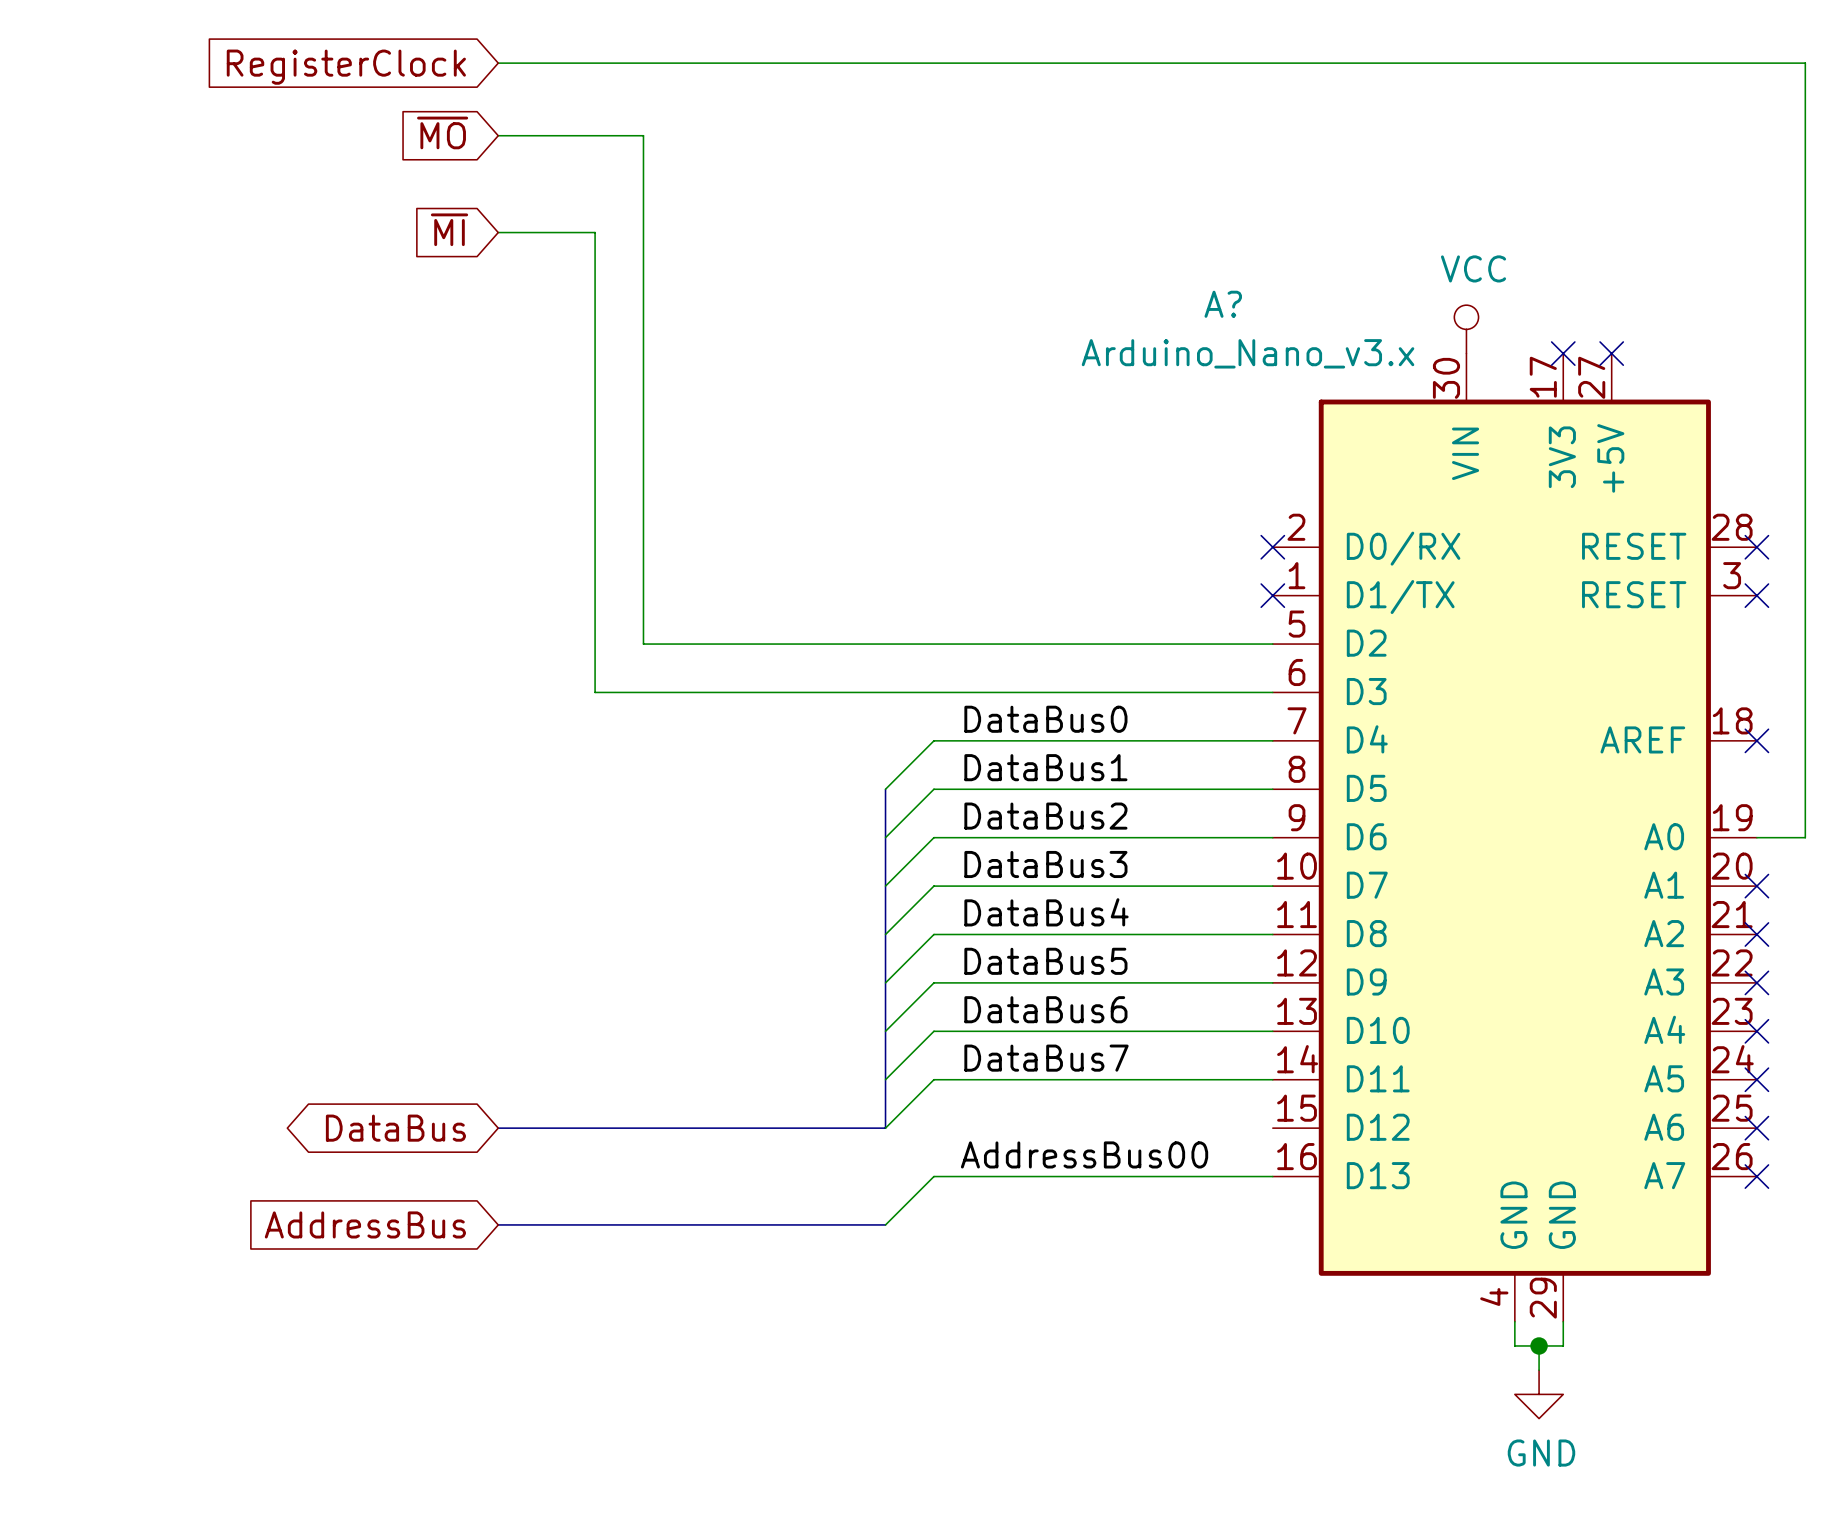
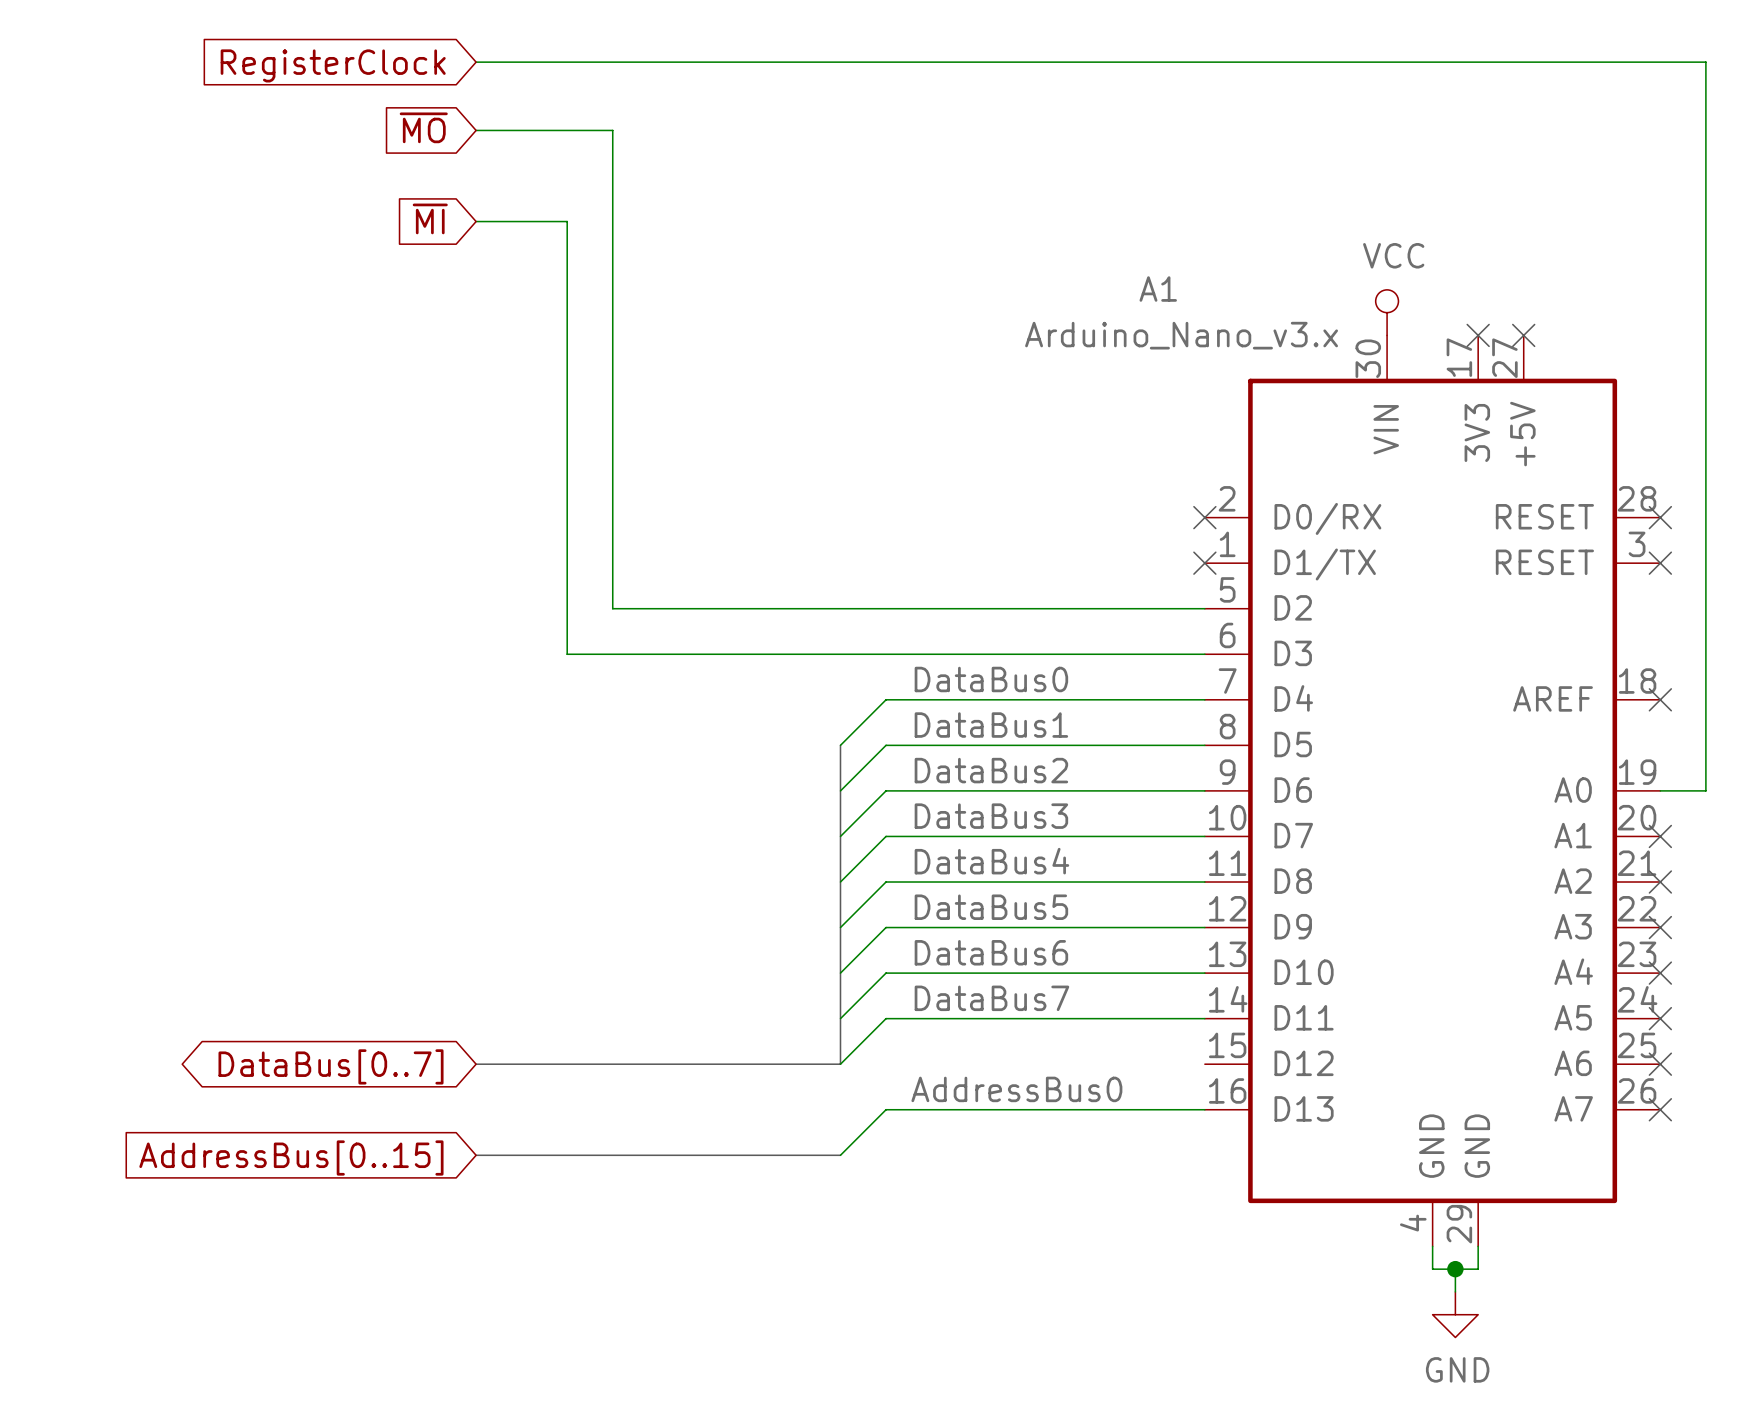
A? name: A? (1223, 304) -> A1 (1158, 289)
global label: DataBus (395, 1128) -> DataBus[0..7] (331, 1066)
label: AddressBus00 (1084, 1154) -> AddressBus0 (1016, 1089)
global label: AddressBus (365, 1224) -> AddressBus[0..15] (291, 1158)

